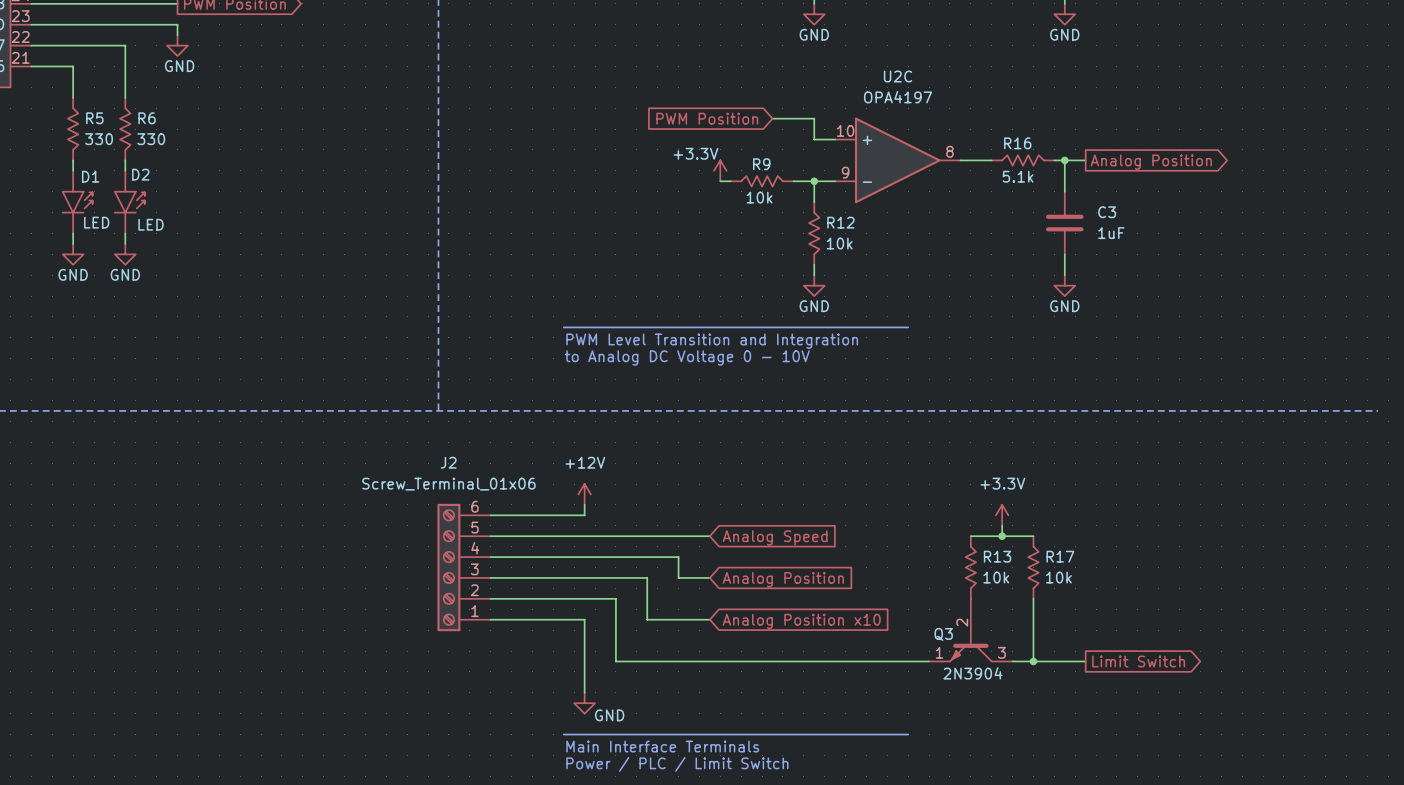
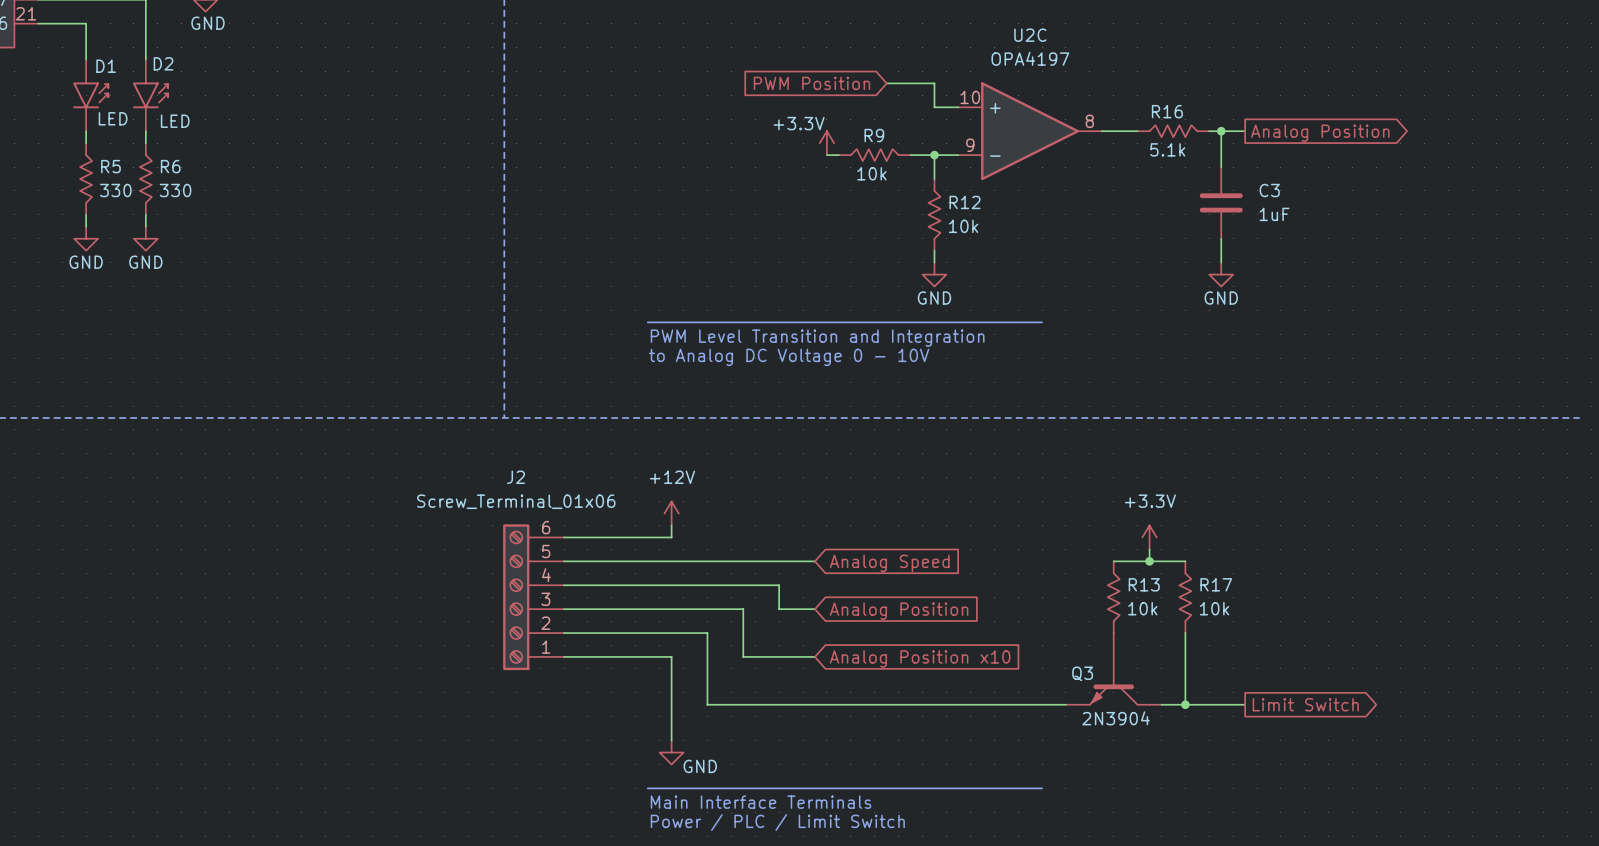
R5 position: (73, 129) -> (86, 179)
R6 position: (125, 129) -> (145, 179)
D1 position: (77, 202) -> (90, 95)
D2 position: (129, 202) -> (150, 95)
Q3 pin number: 2 (962, 622) -> none
Q3 pin number: 1 (939, 652) -> none
Q3 pin number: 3 (1001, 652) -> none

